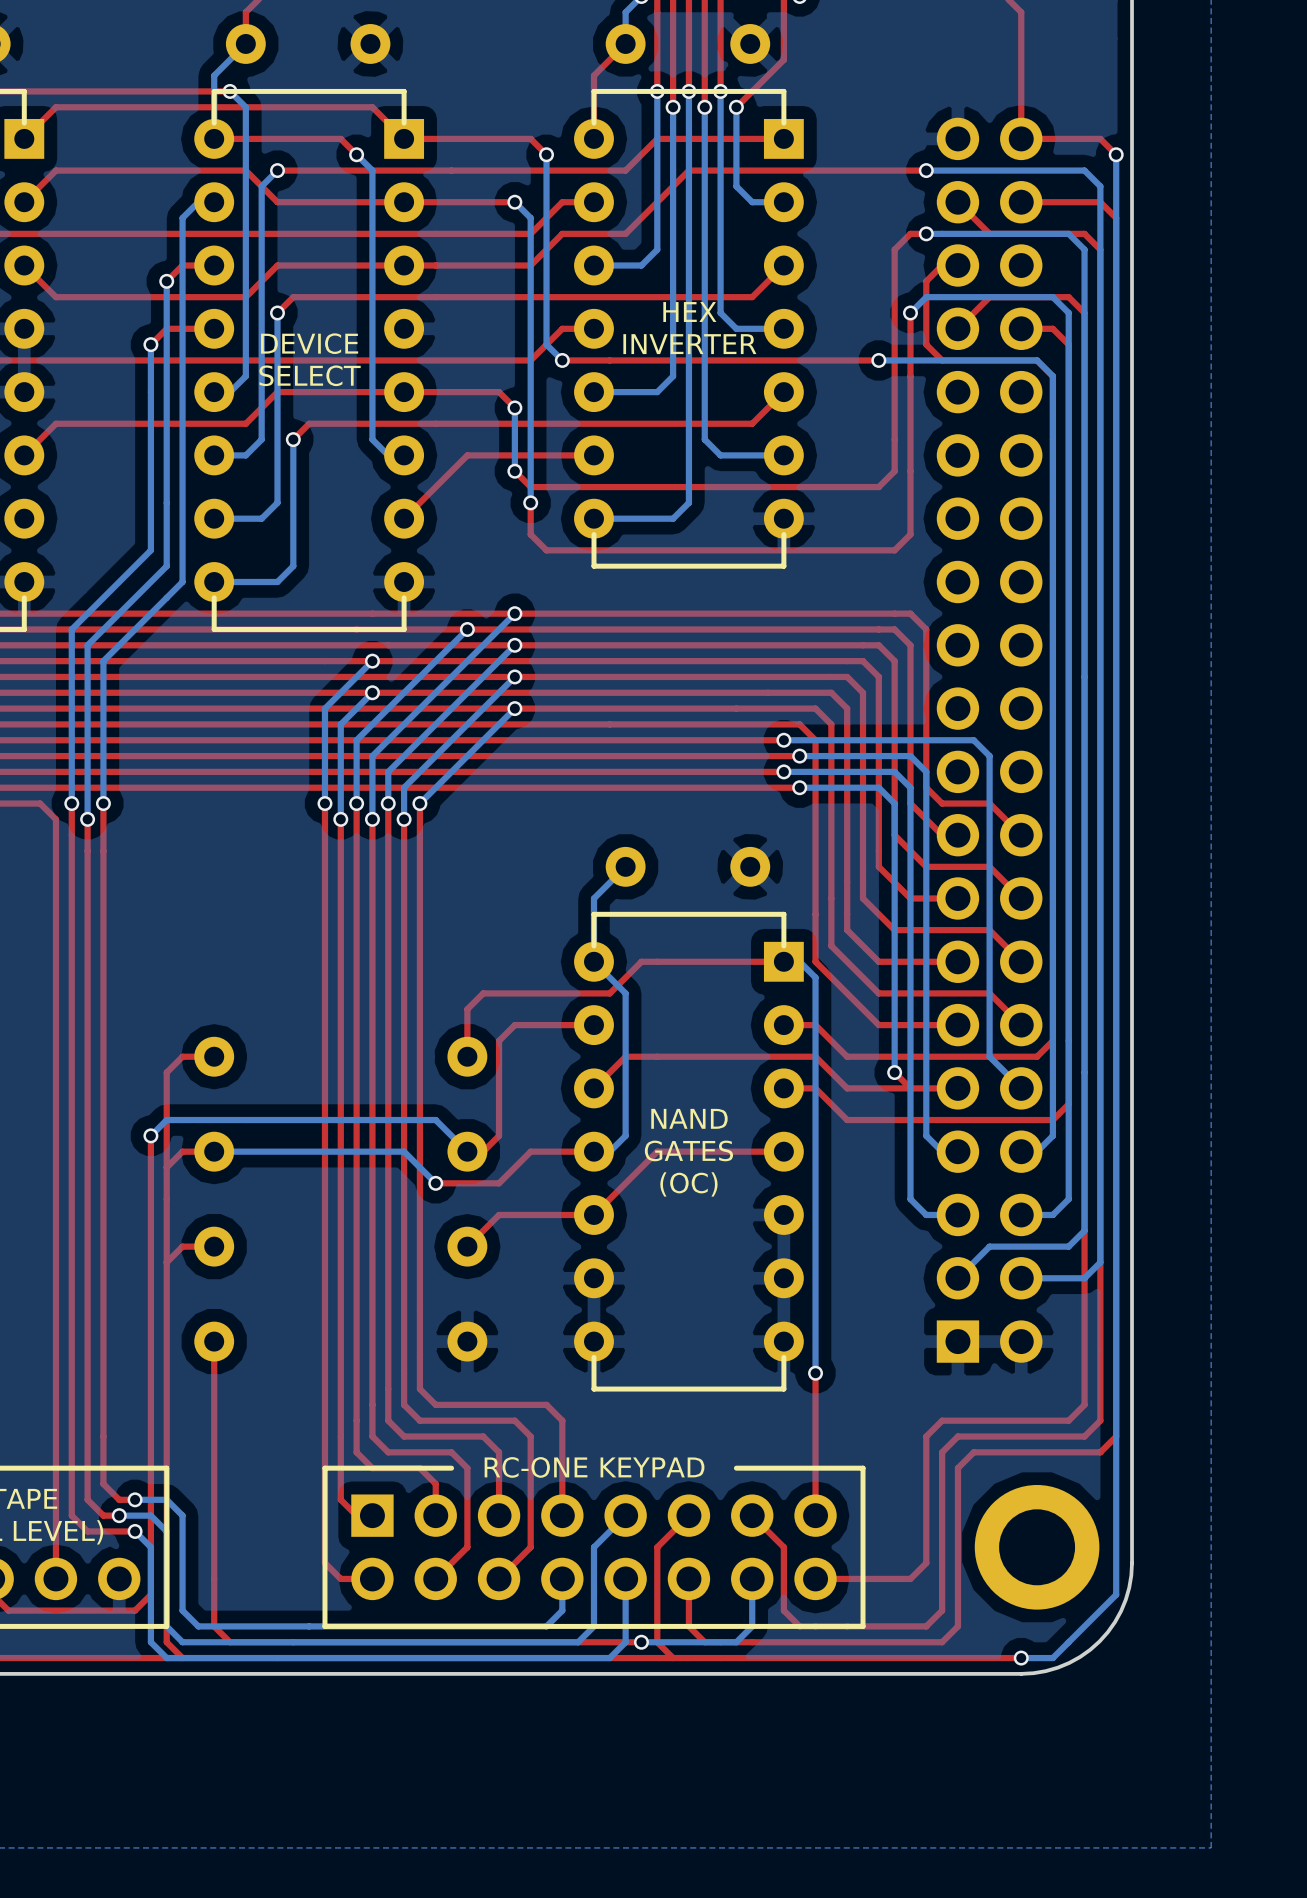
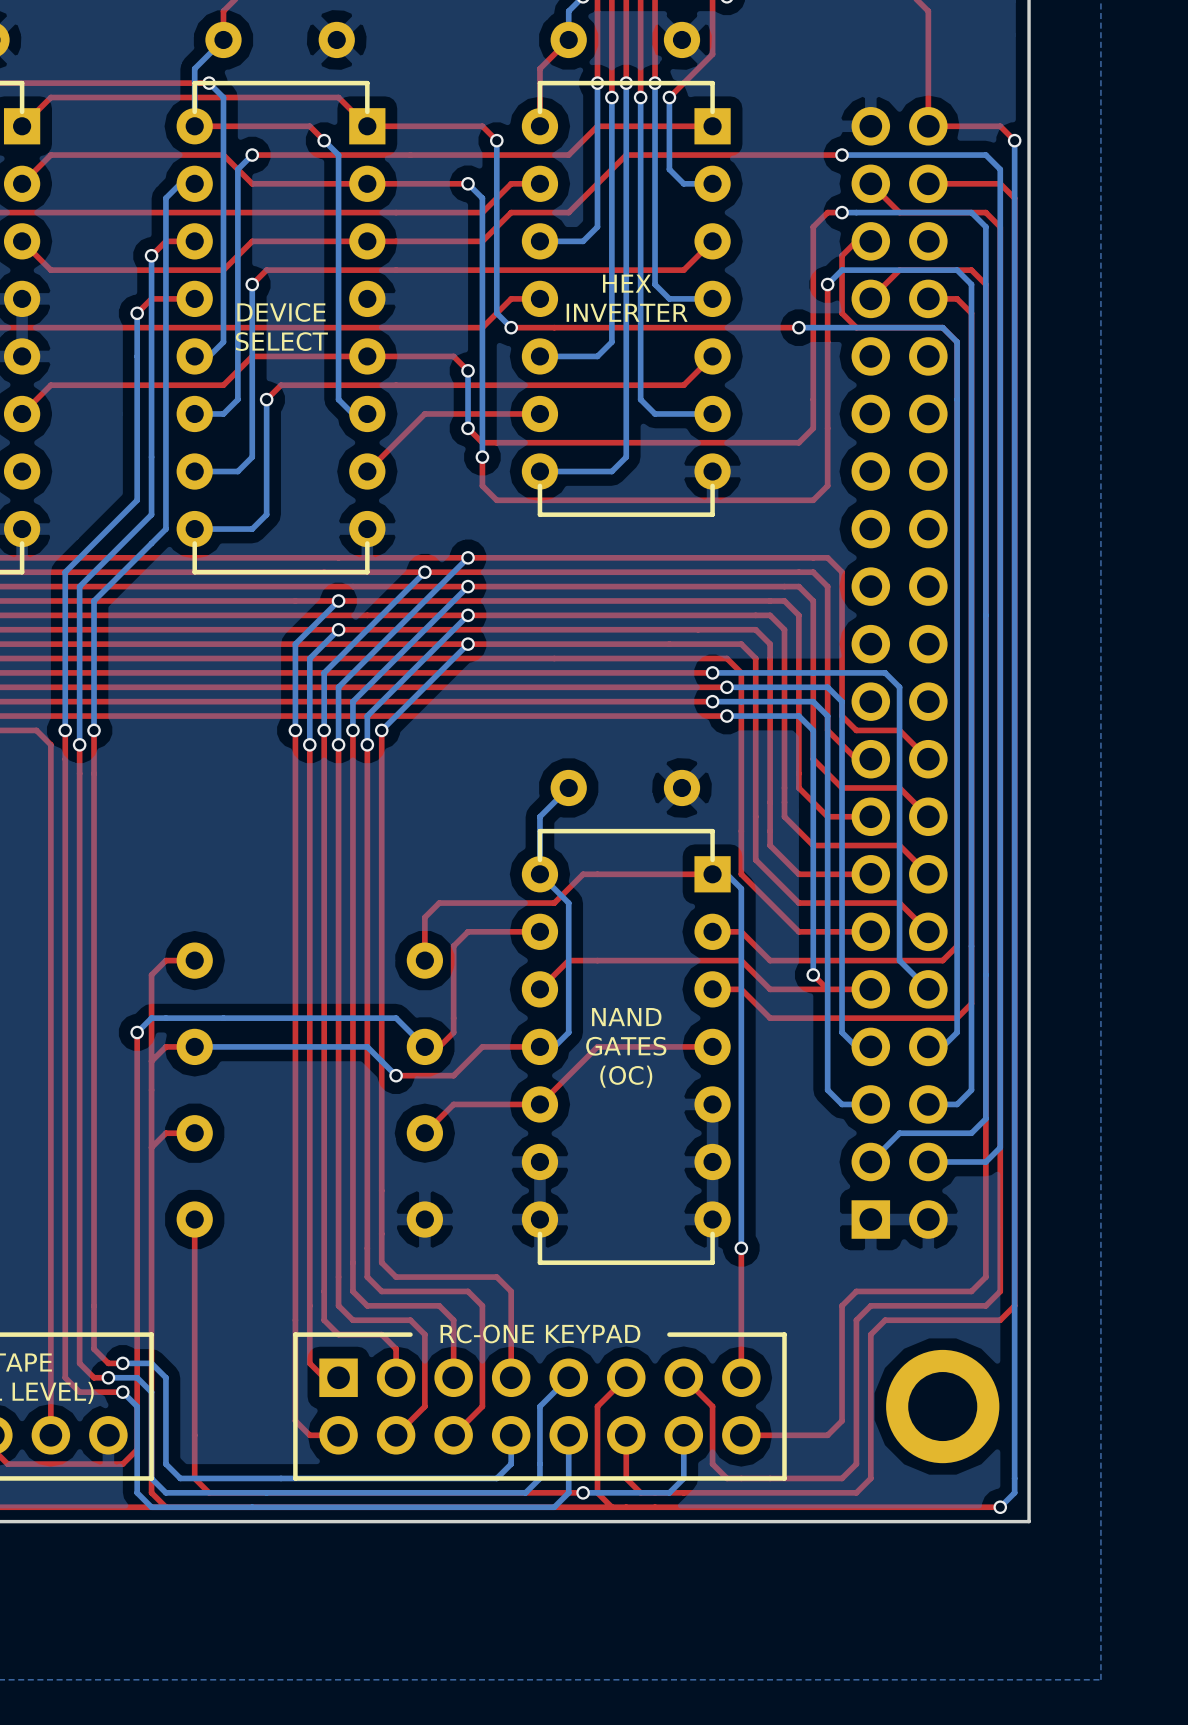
board edge: (1132, 1563) (1129, 1587) (1121, 1611) (1099, 1641) (1080, 1656) (1057, 1667) (1021, 1673) -> (1029, 1420) (1029, 1521) (928, 1521)
bottom track: (1116, 1594) (1052, 1658) (1021, 1658) -> (1014, 1449) (1014, 1492) (1000, 1507)
via position: (1021, 1658) -> (1000, 1507)
top track: none -> (1000, 1507) (928, 1507)

